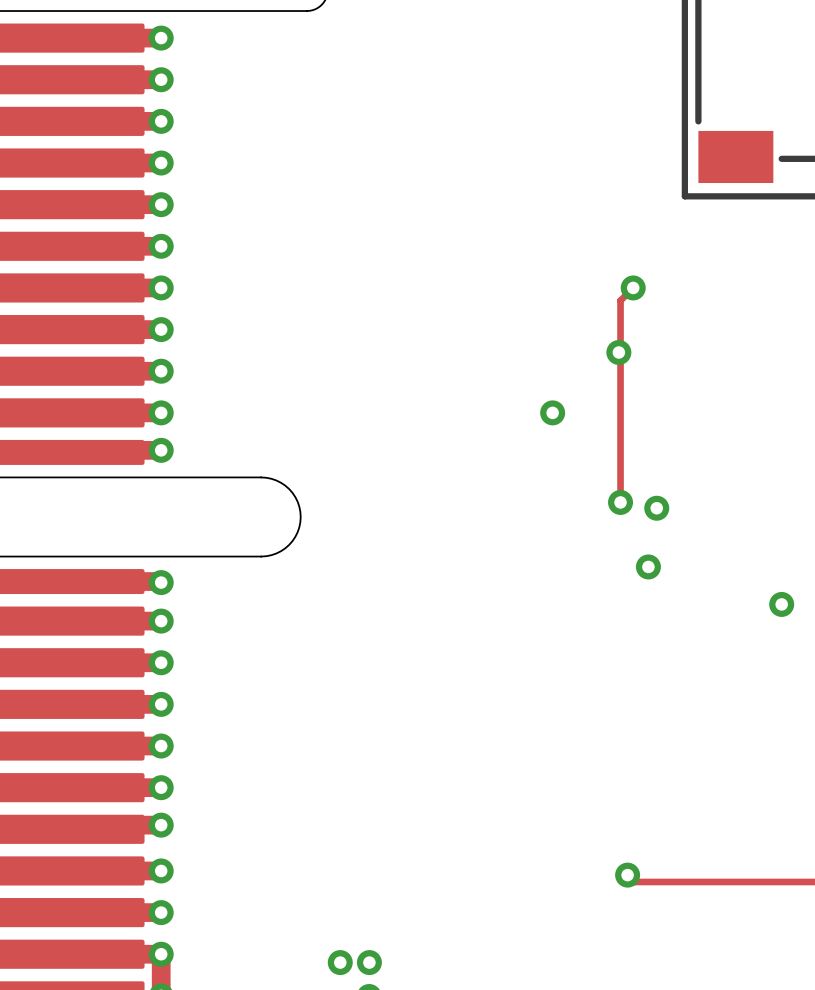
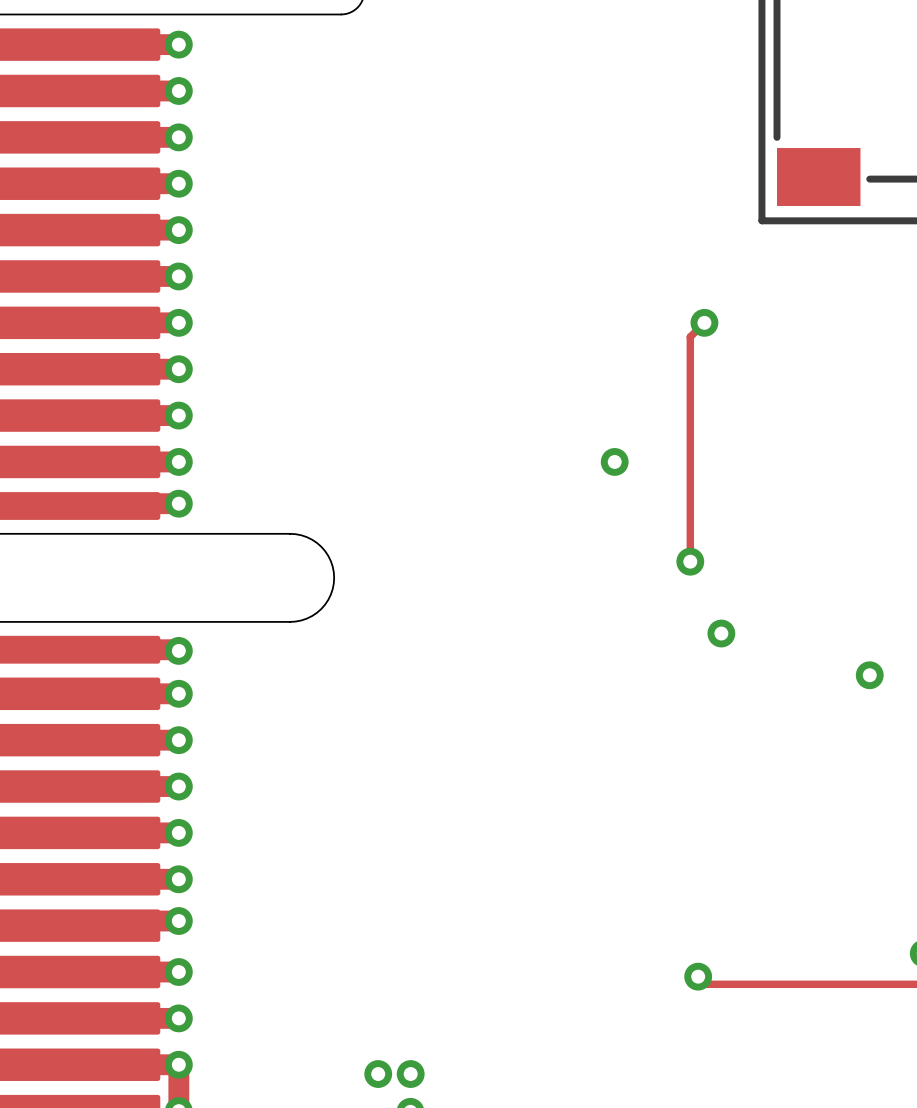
via: (618, 352) -> none
via: (656, 508) -> none

